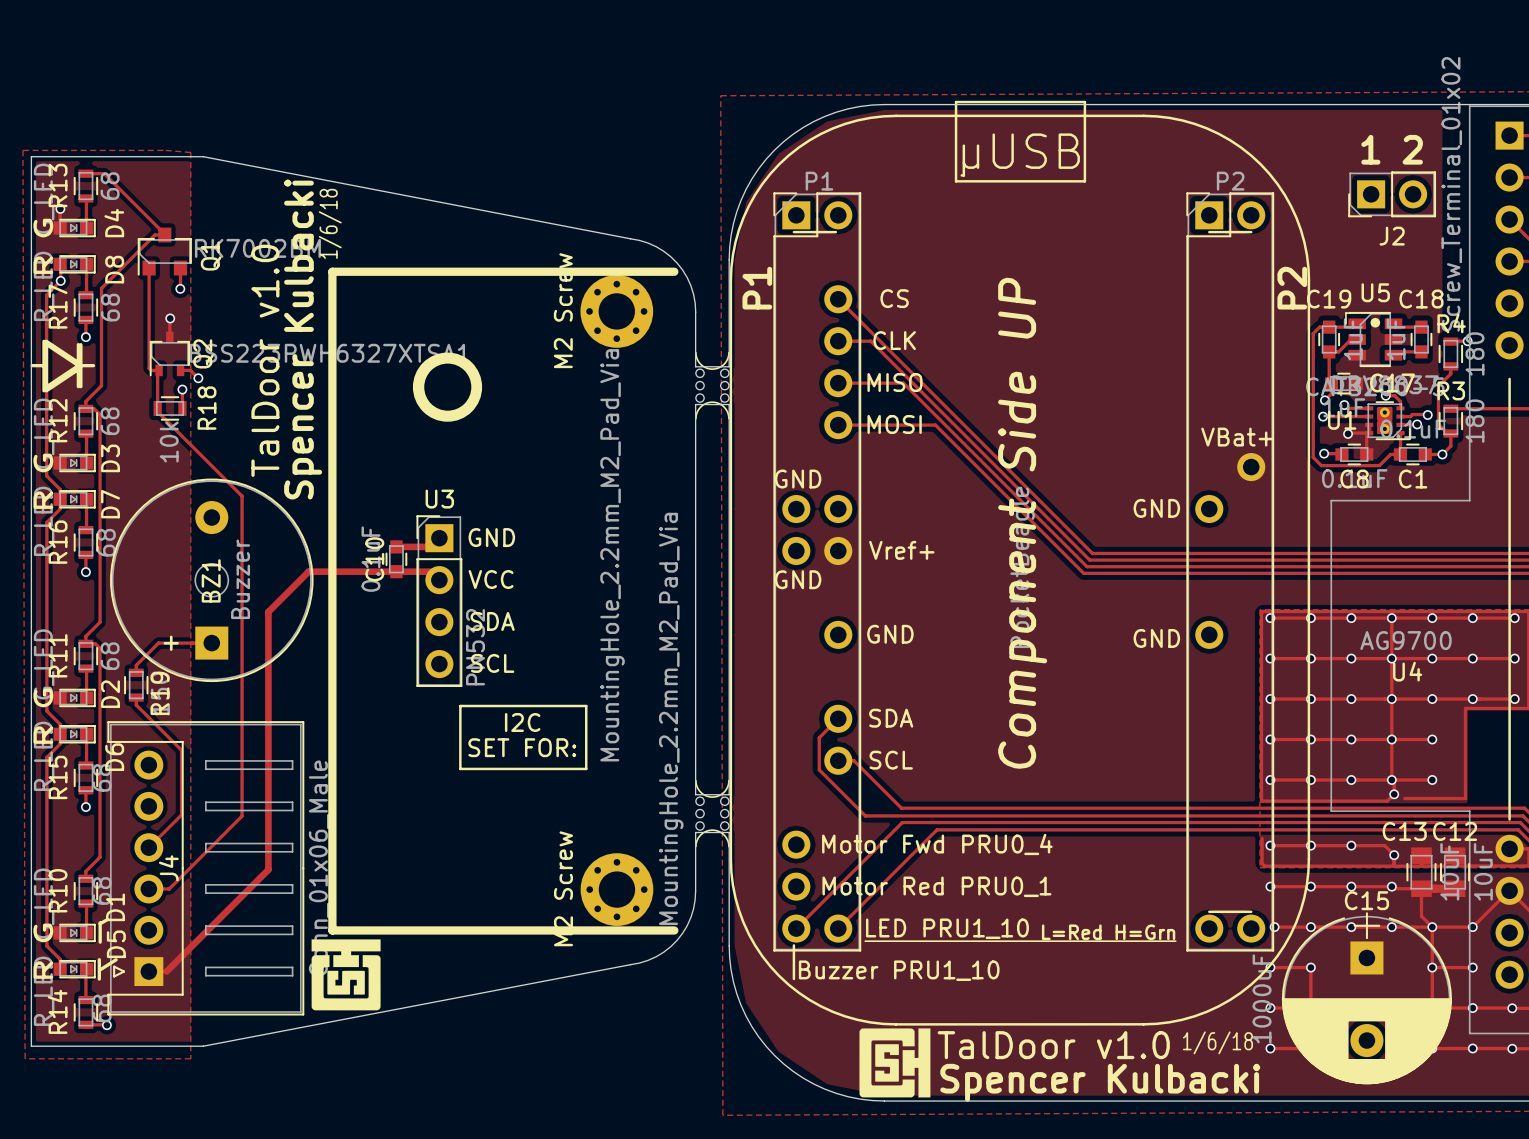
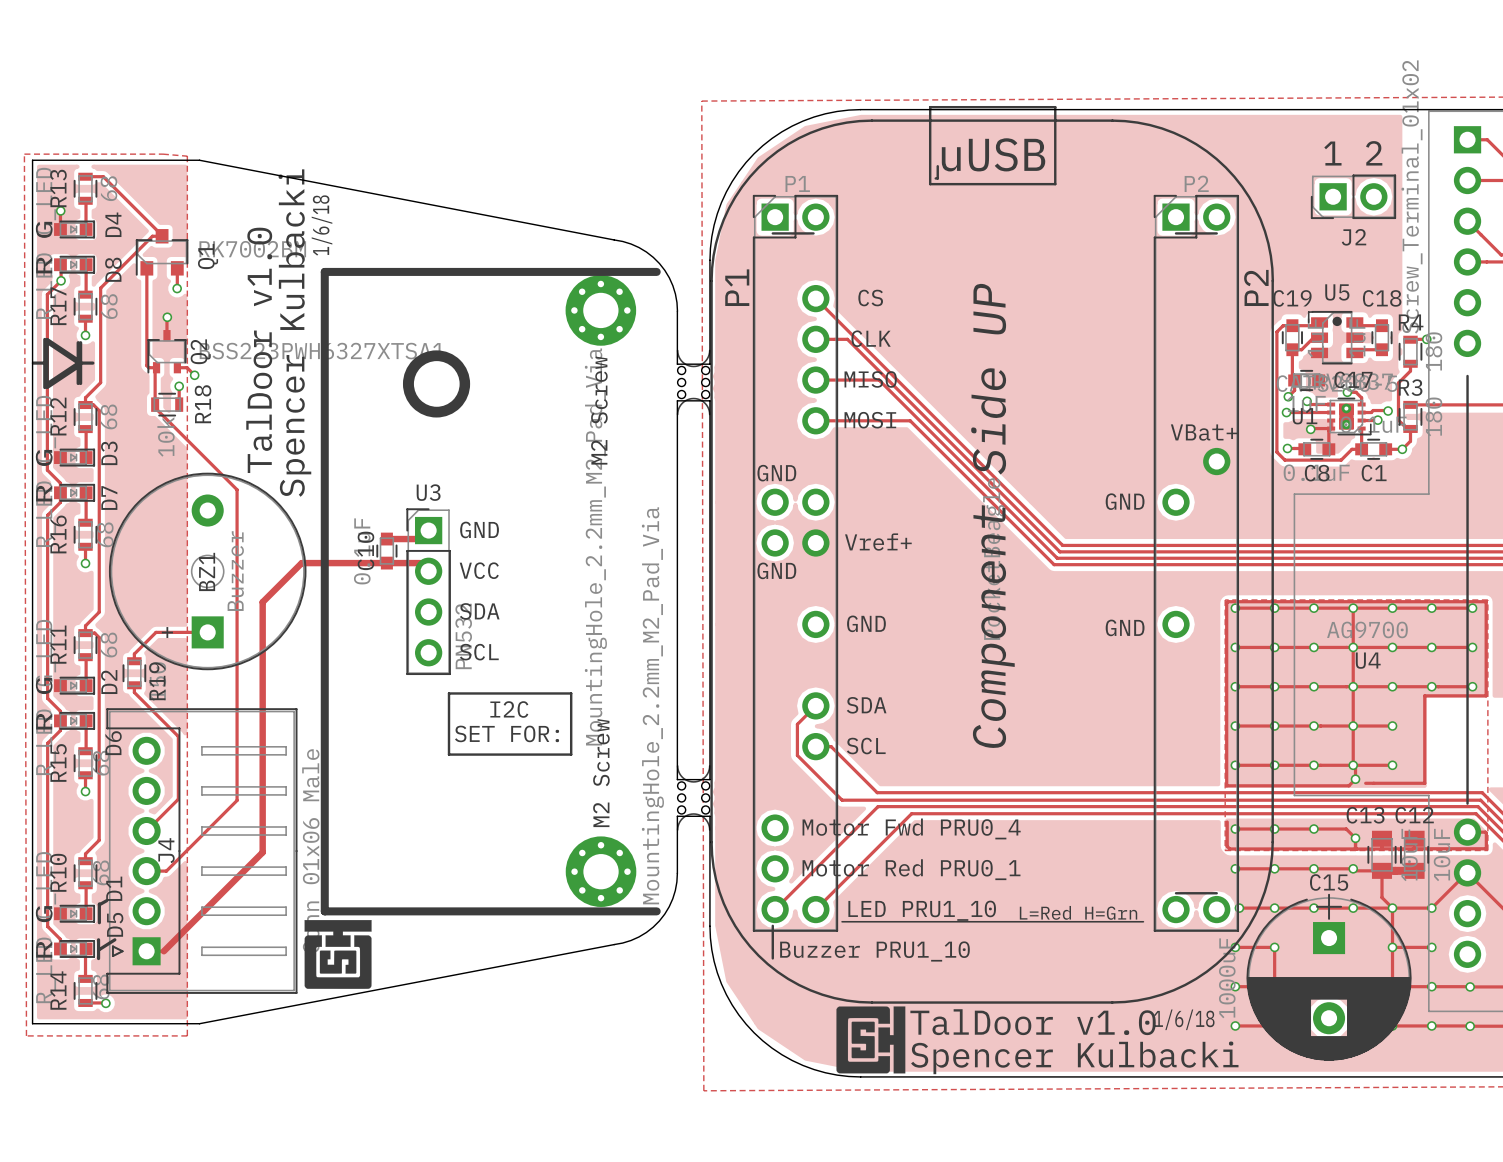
M2 Screw name position: M2 Screw (563, 310) -> M2 Screw (599, 410)
M2 Screw name position: M2 Screw (563, 888) -> M2 Screw (601, 773)

